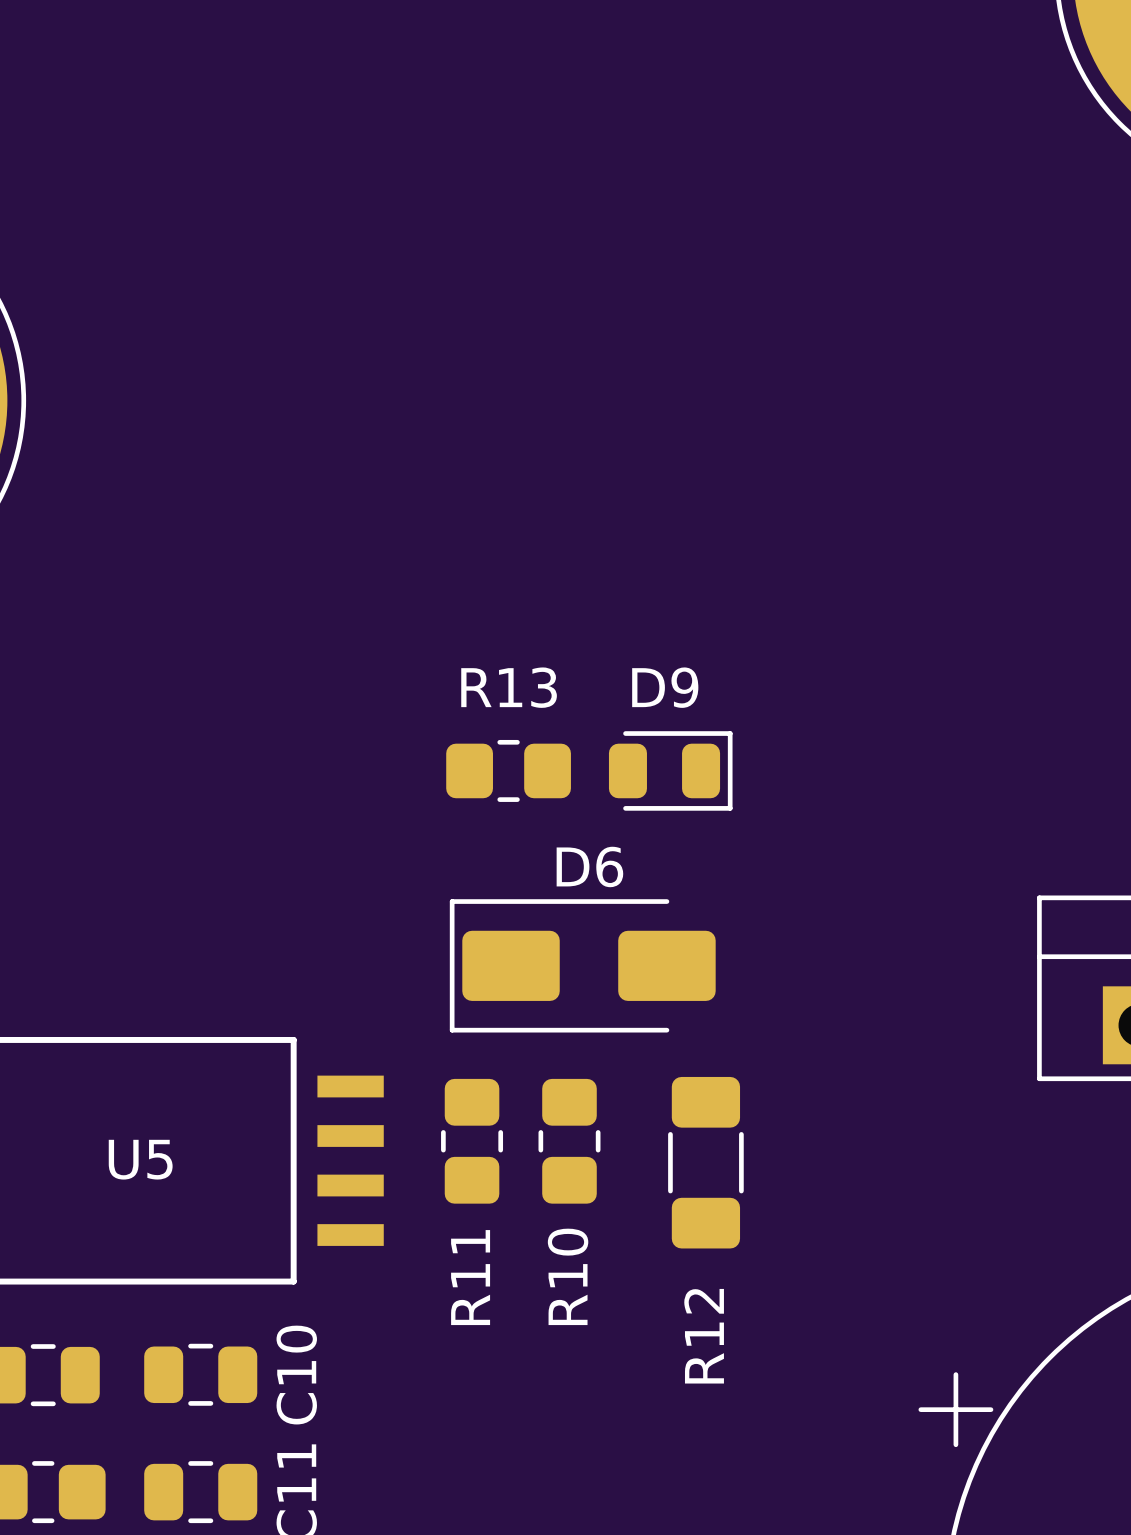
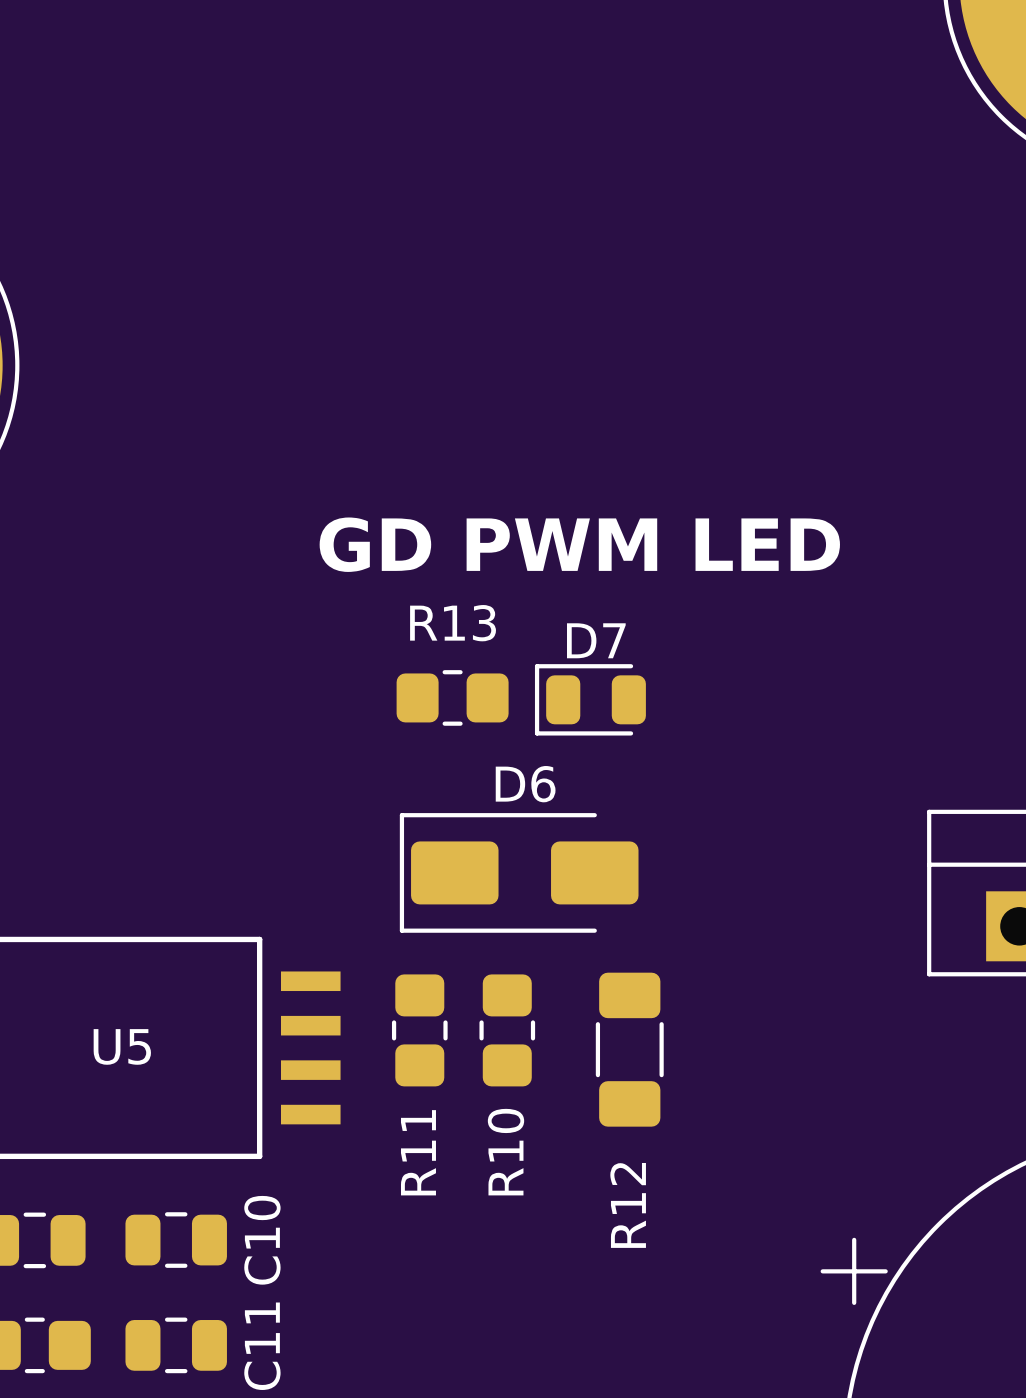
text: none -> GD PWM LED (579, 544)
D9: (670, 770) -> none
D7: none -> (590, 699)

